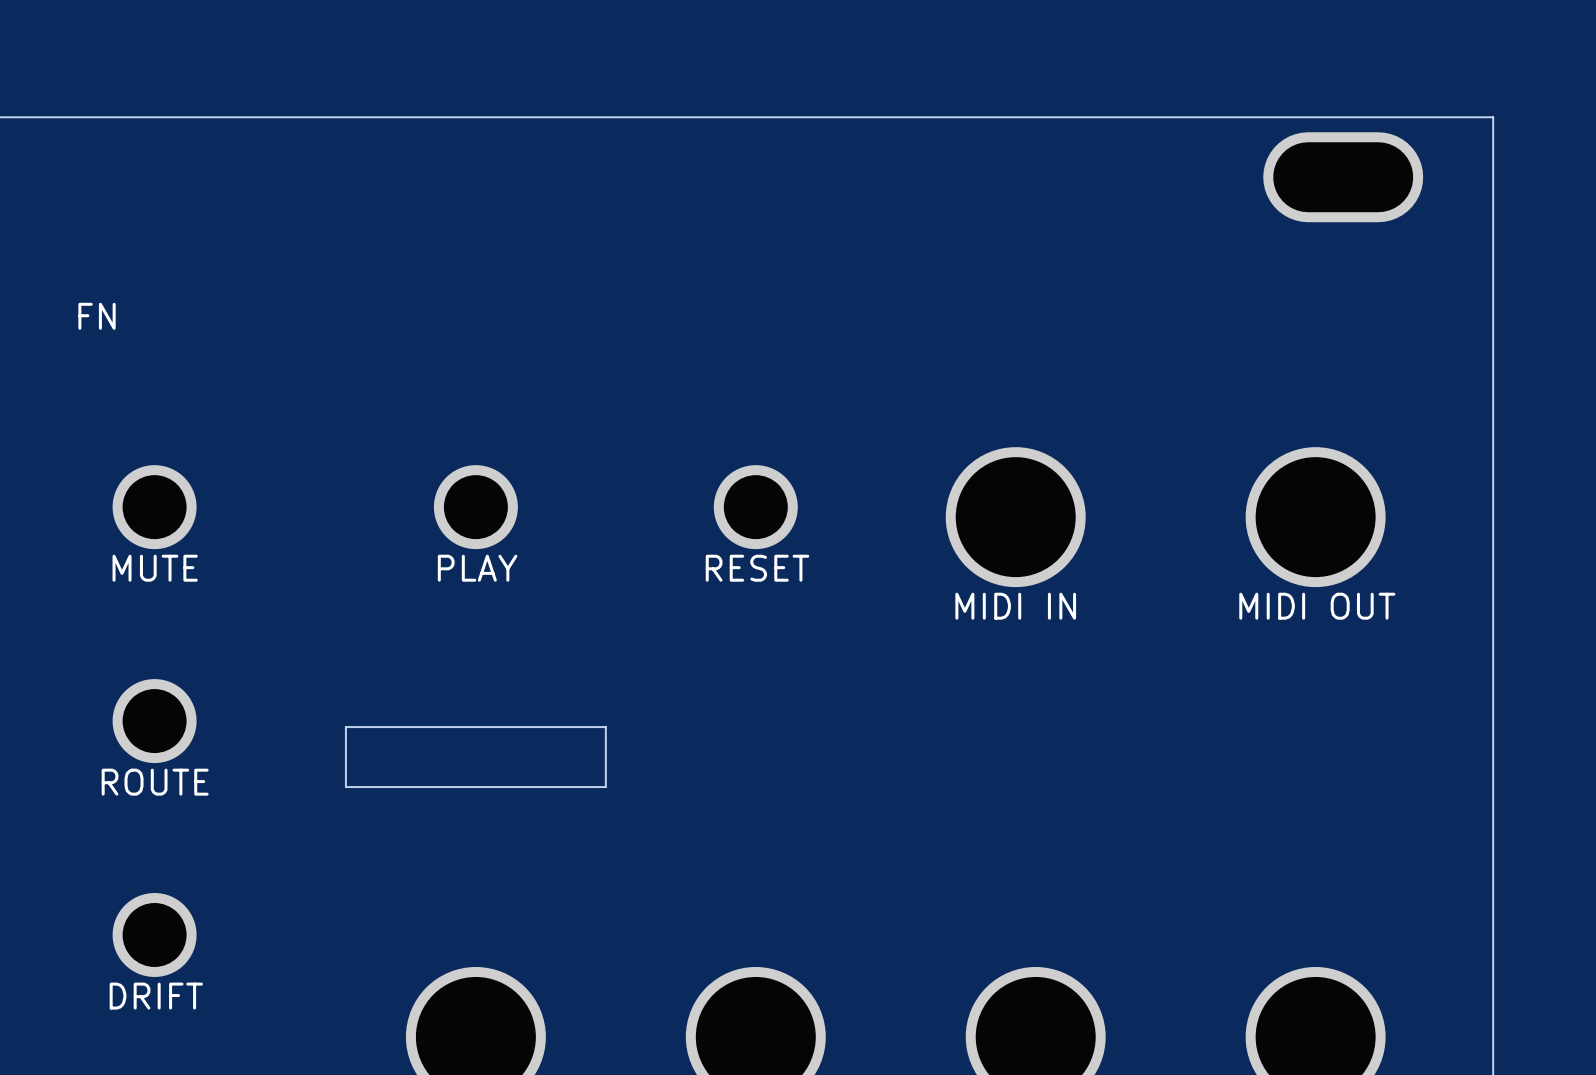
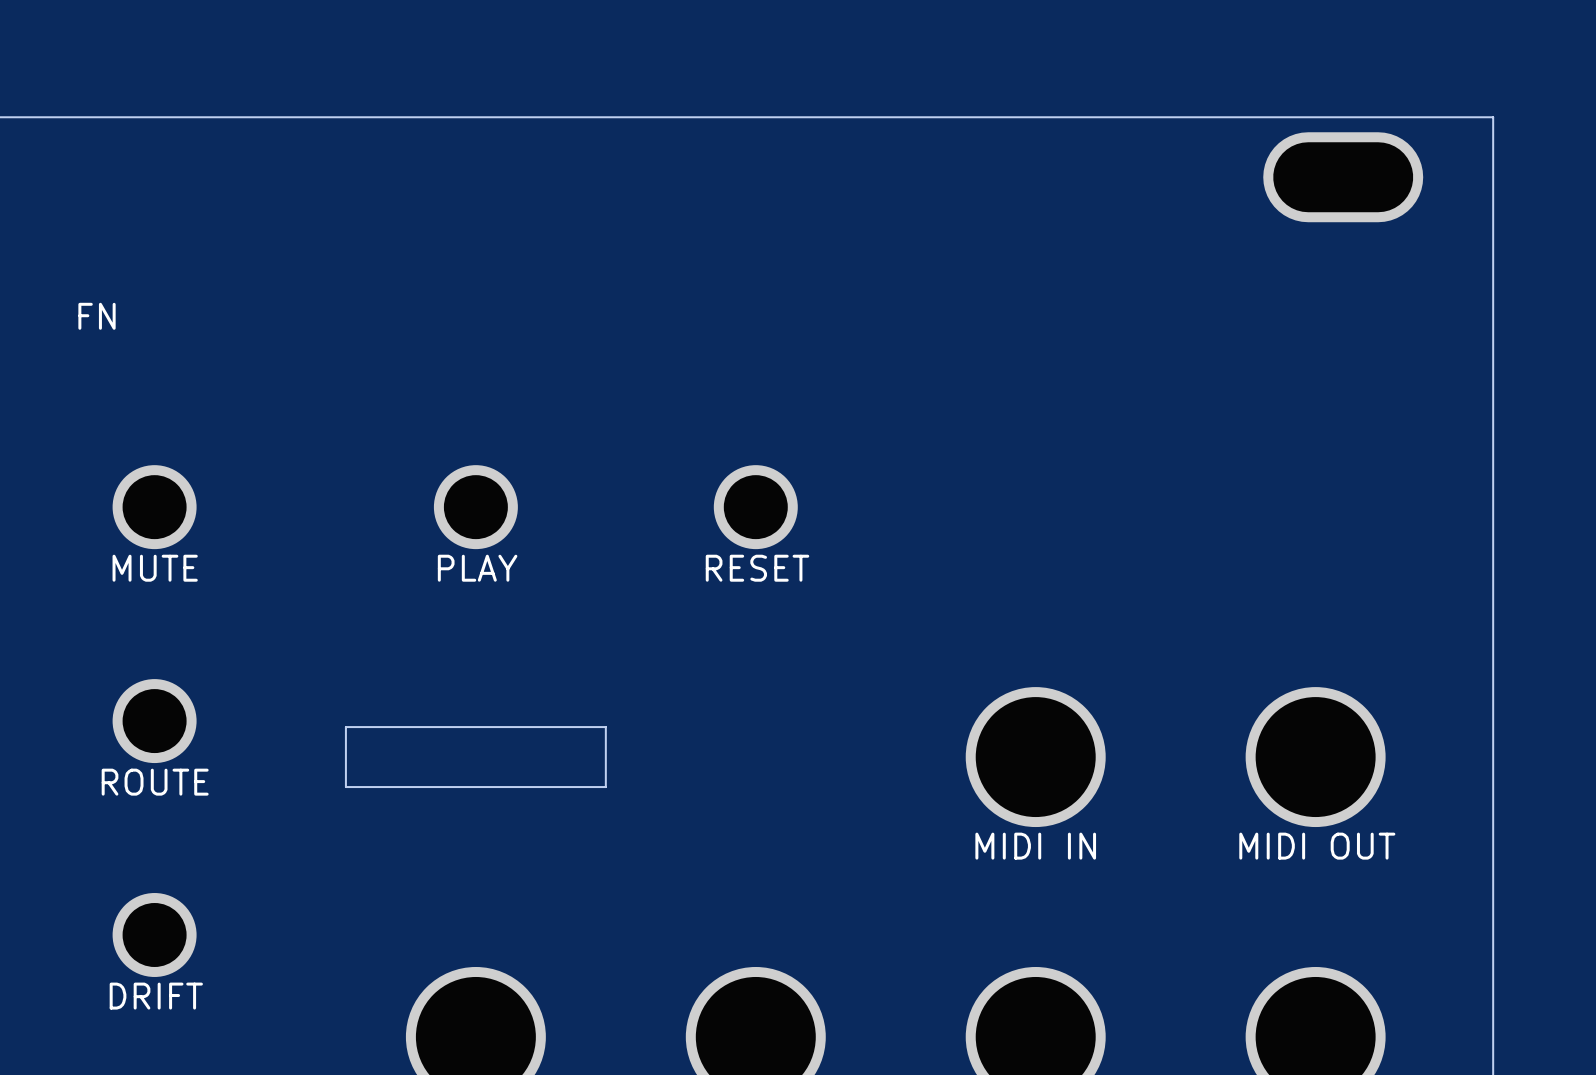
part position: (1015, 517) -> (1035, 757)
part position: (1315, 517) -> (1315, 757)

